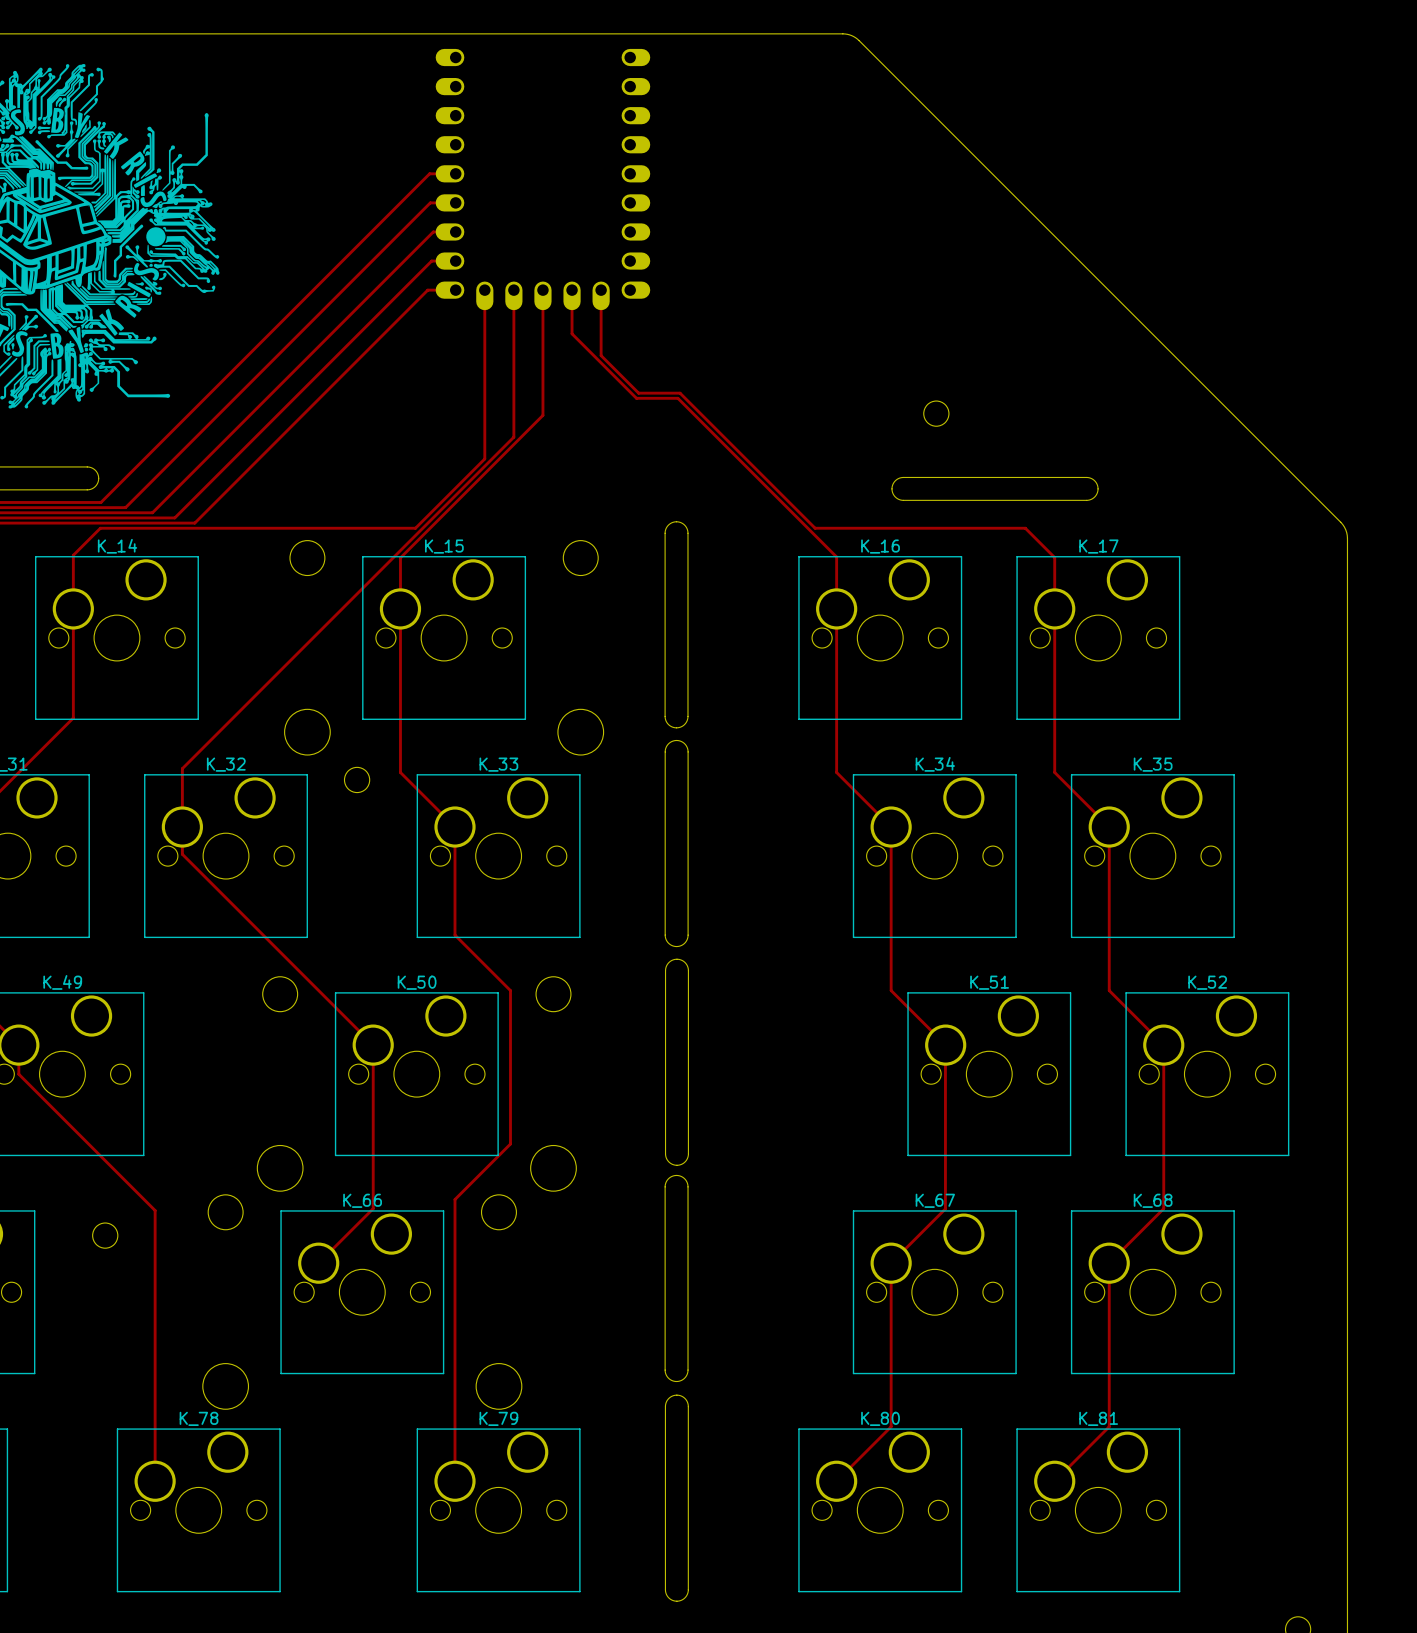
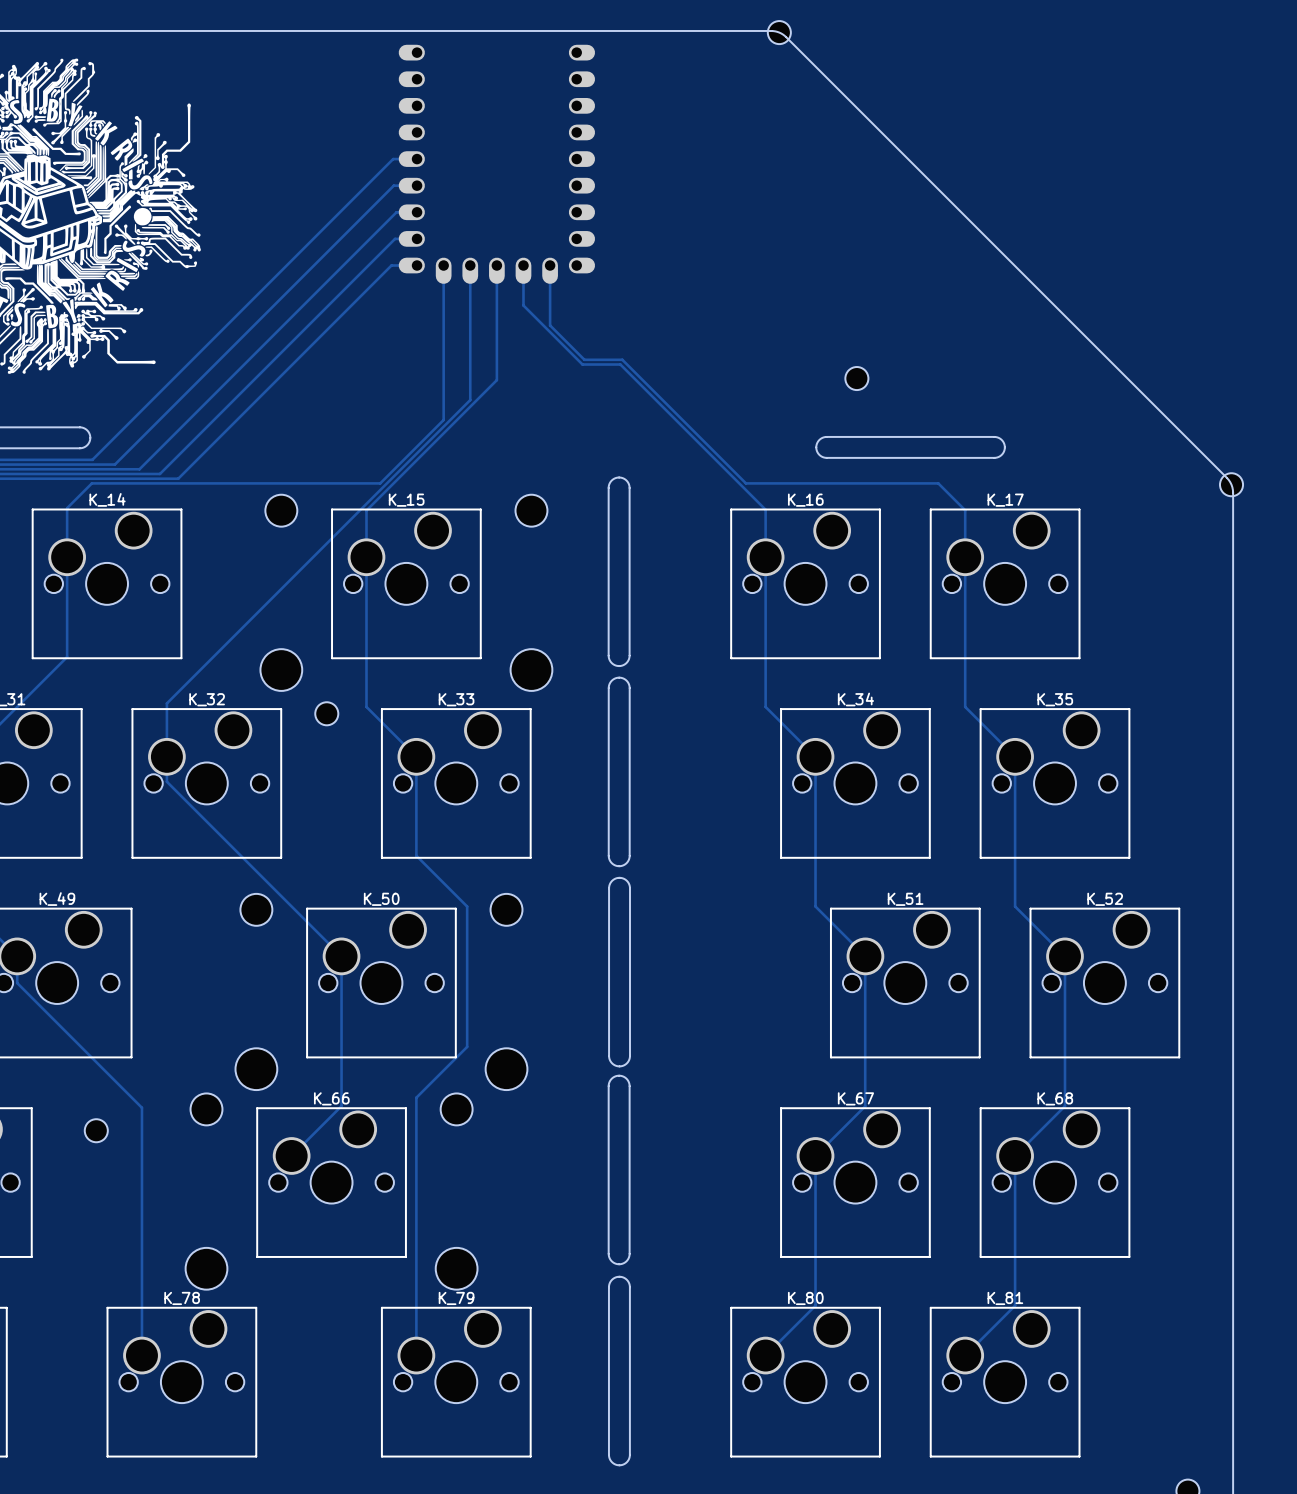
part: none -> (779, 32)
part: none -> (1231, 484)

